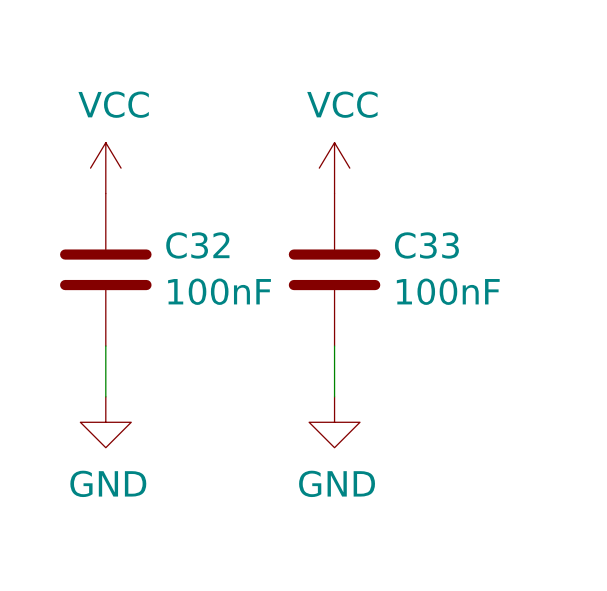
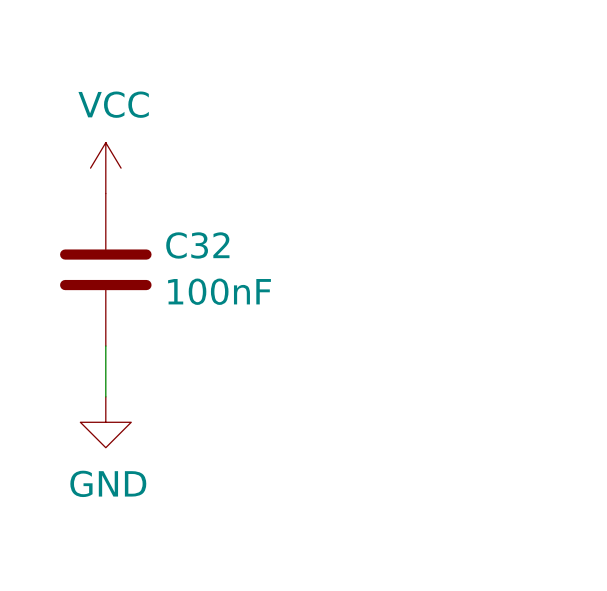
power symbol: VCC (334, 168) -> none
C33: 100nF (334, 269) -> none
wire: (334, 346) (334, 396) -> none
power symbol: GND (334, 422) -> none

